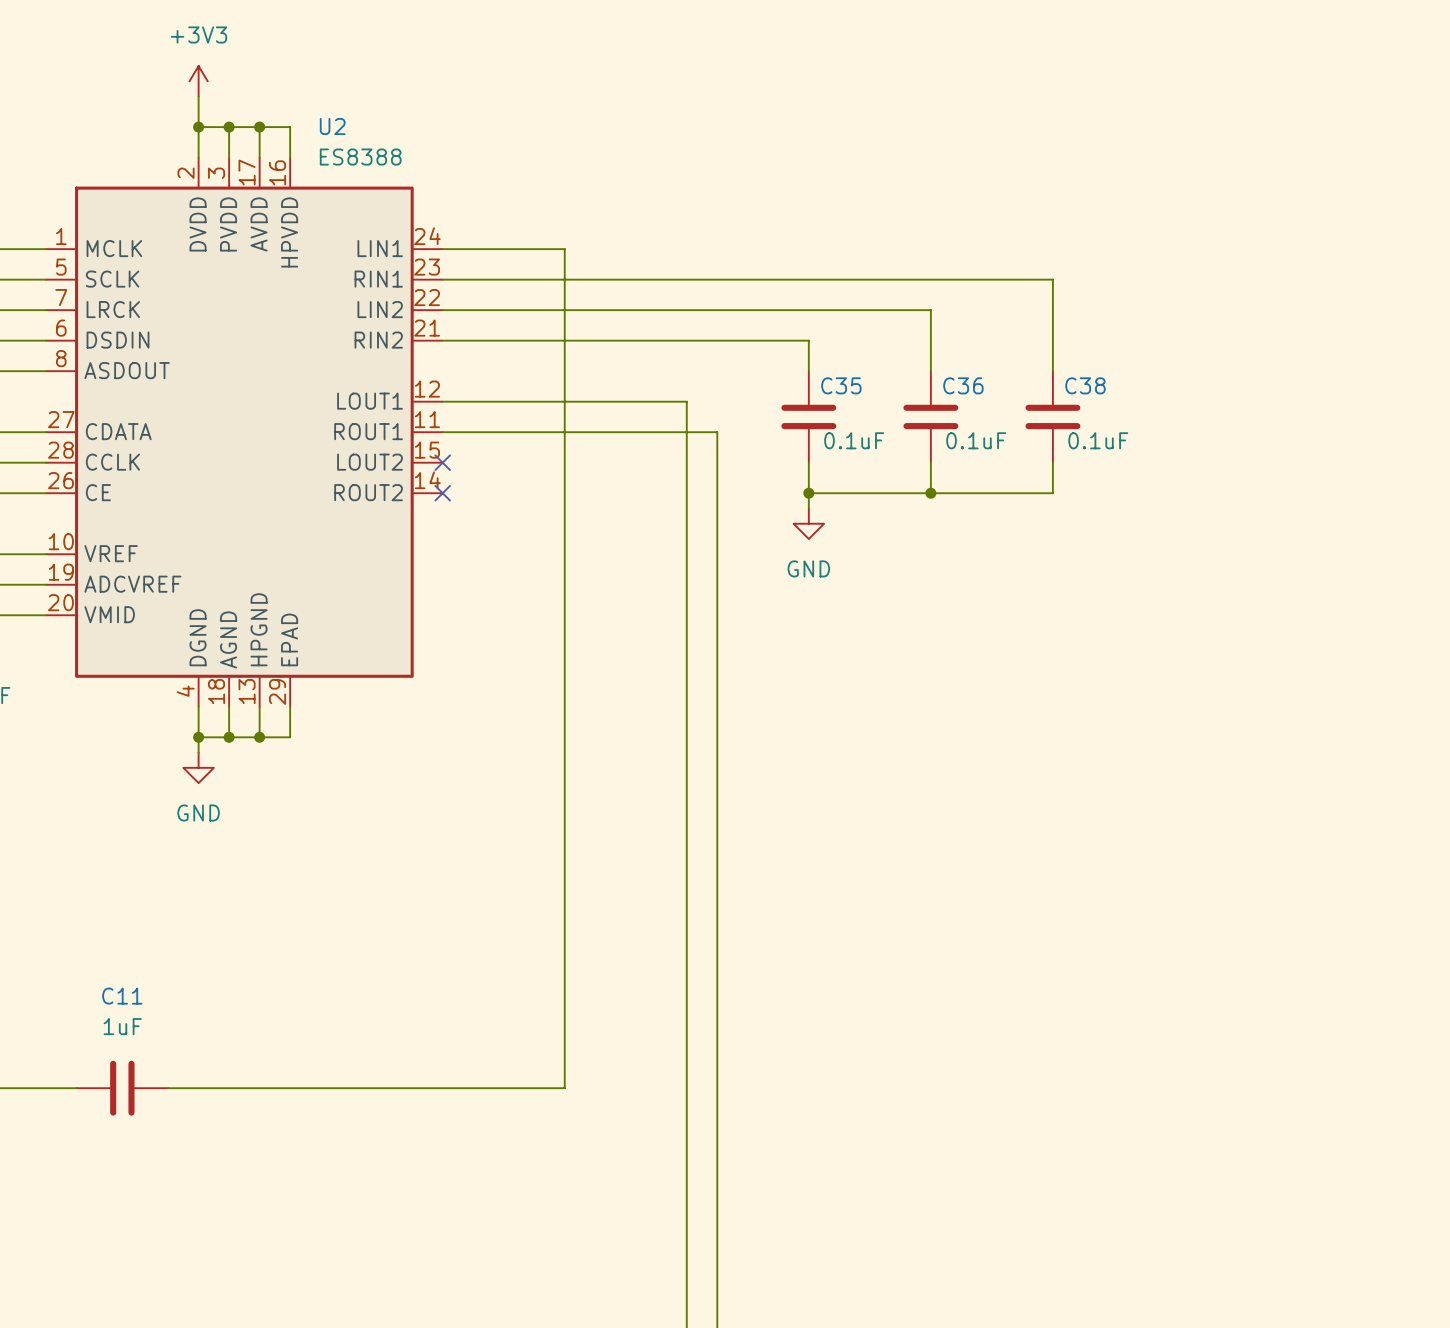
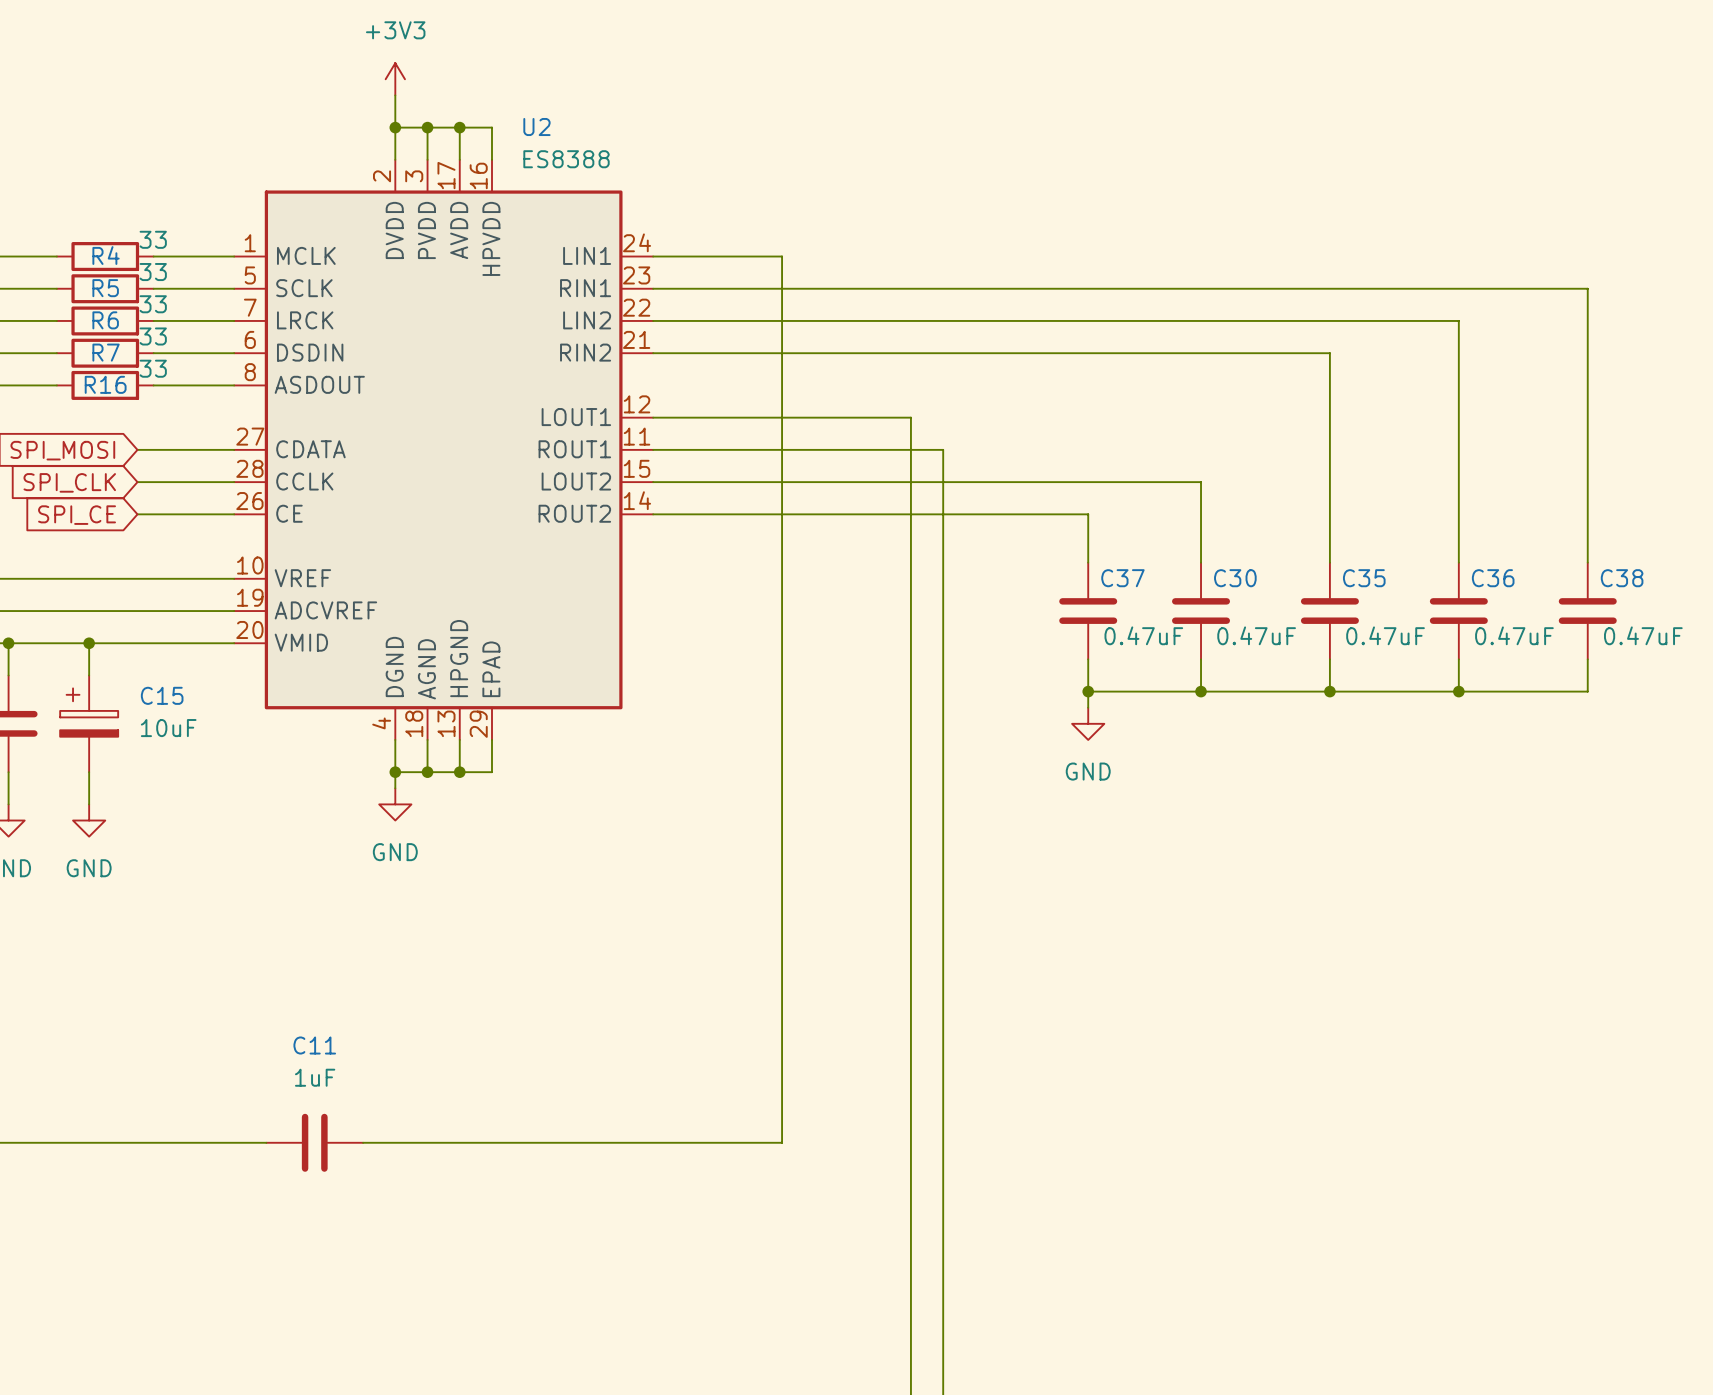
wire: (1052, 279) (1052, 371) -> (1297, 288) (1587, 288) (1587, 562)
wire: (930, 310) (930, 371) -> (1168, 320) (1458, 320) (1458, 562)
wire: (808, 340) (808, 371) -> (1039, 353) (1329, 353) (1329, 562)
C35 position: (808, 416) -> (1329, 611)
C36 position: (930, 416) -> (1458, 611)
C38 position: (1052, 416) -> (1587, 611)
C35 value: 0.1uF (854, 440) -> 0.47uF (1385, 635)
C36 value: 0.1uF (976, 440) -> 0.47uF (1514, 635)
C38 value: 0.1uF (1098, 440) -> 0.47uF (1643, 635)
wire: none -> (653, 482) (1201, 482) (1201, 562)
no-connect mark: (442, 462) -> none
wire: (808, 462) (808, 508) -> (1088, 659) (1088, 707)
wire: (930, 462) (930, 493) -> (1201, 659) (1201, 691)
wire: (1052, 462) (1052, 493) (854, 493) -> (1088, 562) (1088, 514)
wire: none -> (653, 514) (1039, 514)
no-connect mark: (442, 493) -> none
junction: (808, 493) -> none
junction: (930, 493) -> none
power symbol position: GND (808, 523) -> GND (1088, 723)
C37: none -> 0.47uF (1088, 611)
C30: none -> 0.47uF (1201, 611)
wire: none -> (1329, 659) (1329, 691)
wire: none -> (1458, 659) (1458, 691)
wire: none -> (1587, 659) (1587, 691) (1088, 691)
junction: none -> (1088, 691)
junction: none -> (1201, 691)
junction: none -> (1329, 691)
junction: none -> (1458, 691)

